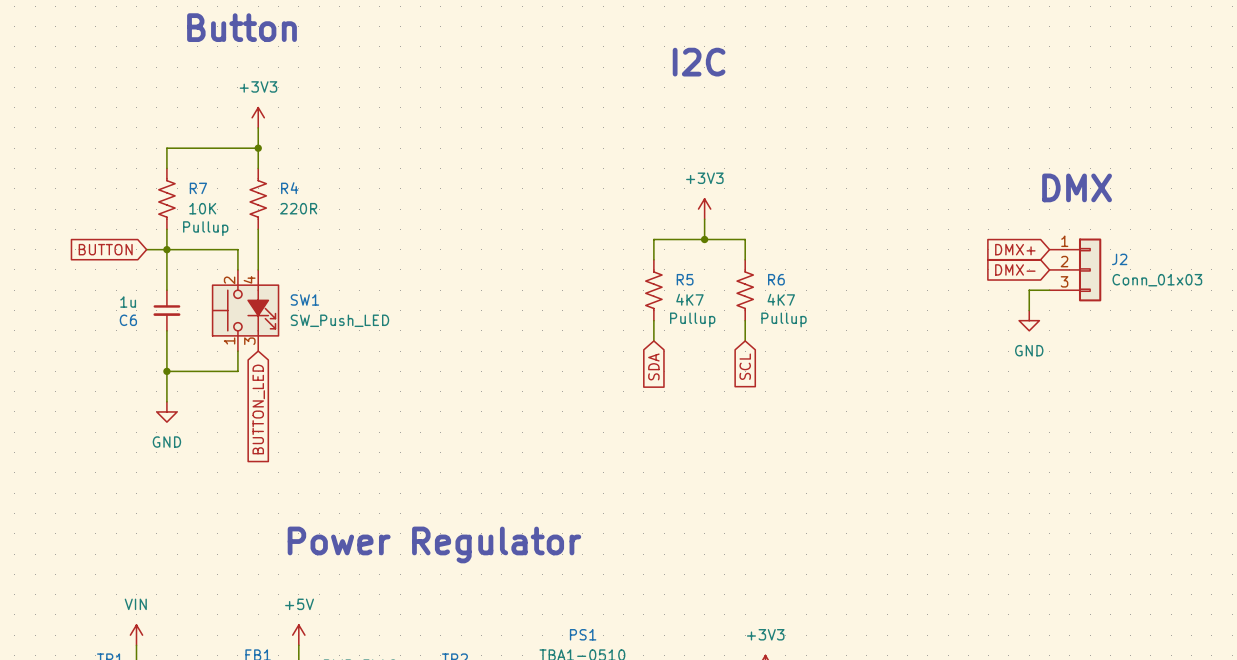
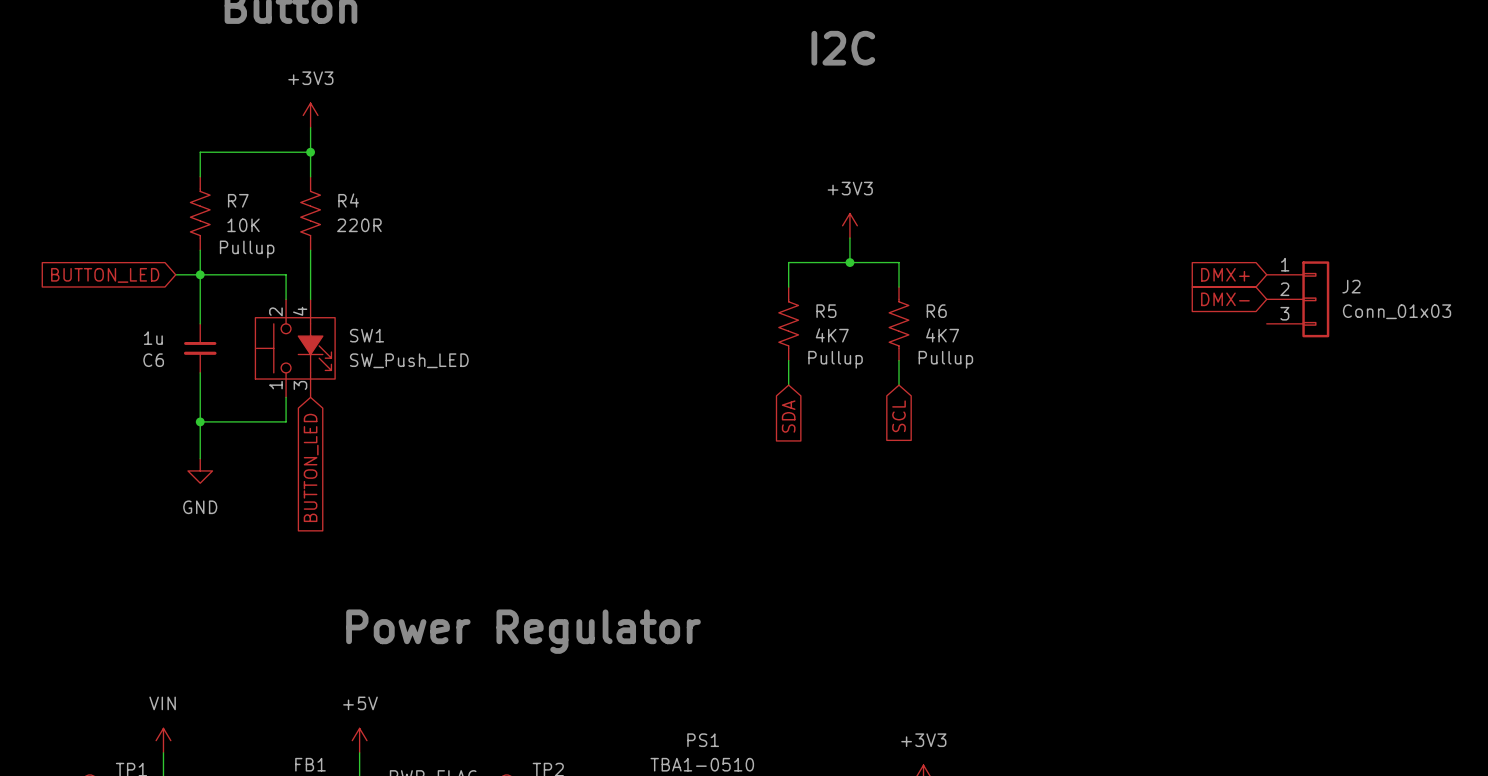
text: DMX (1077, 187) -> none
global label: BUTTON (105, 249) -> BUTTON_LED (105, 275)
wire: (1049, 290) (1029, 290) (1029, 310) -> none
power symbol: GND (1029, 320) -> none

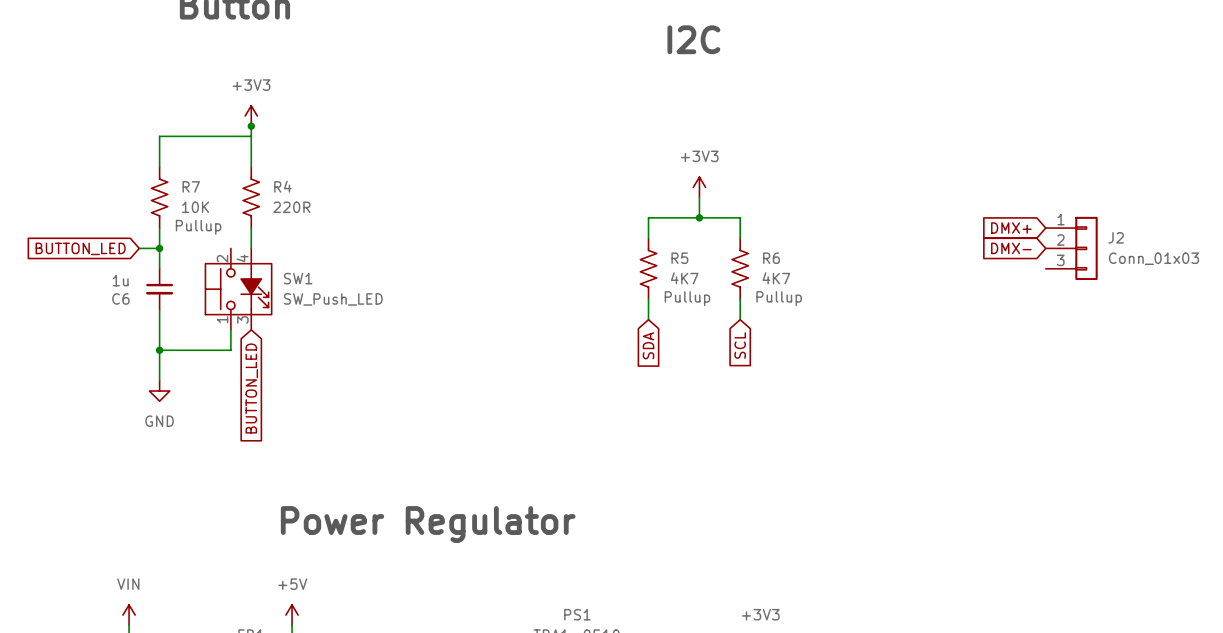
power symbol position: +3V3 (310, 115) -> +3V3 (251, 116)
wire: (310, 127) (310, 152) (200, 152) (200, 164) -> (251, 136) (159, 136)
R7 position: (200, 213) -> (159, 197)
R4 position: (310, 213) -> (251, 197)
wire: (175, 274) (286, 274) (286, 299) -> none
junction position: (200, 274) -> (159, 248)
global label position: BUTTON_LED (105, 275) -> BUTTON_LED (80, 248)
wire: none -> (139, 248) (159, 248)

